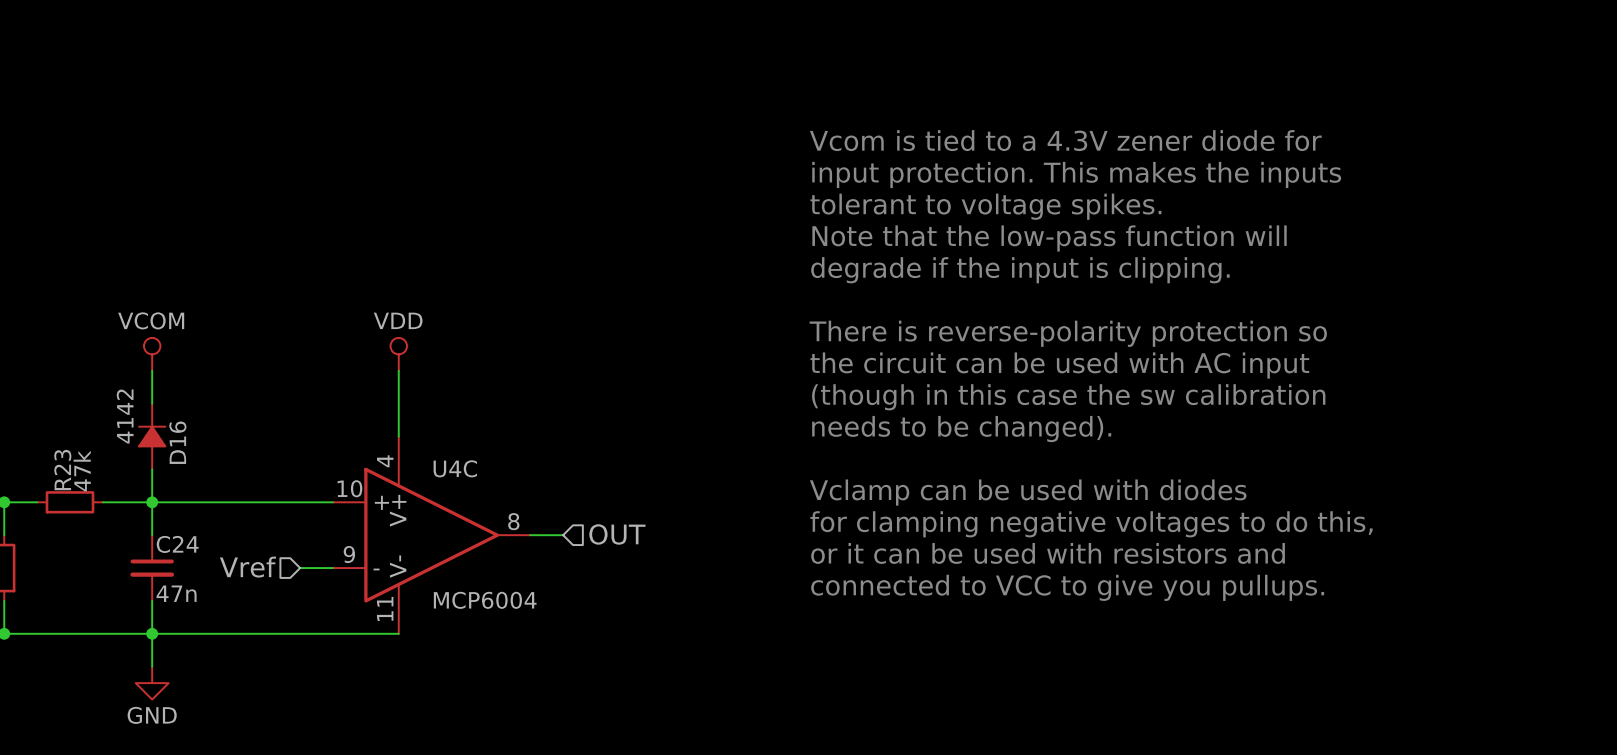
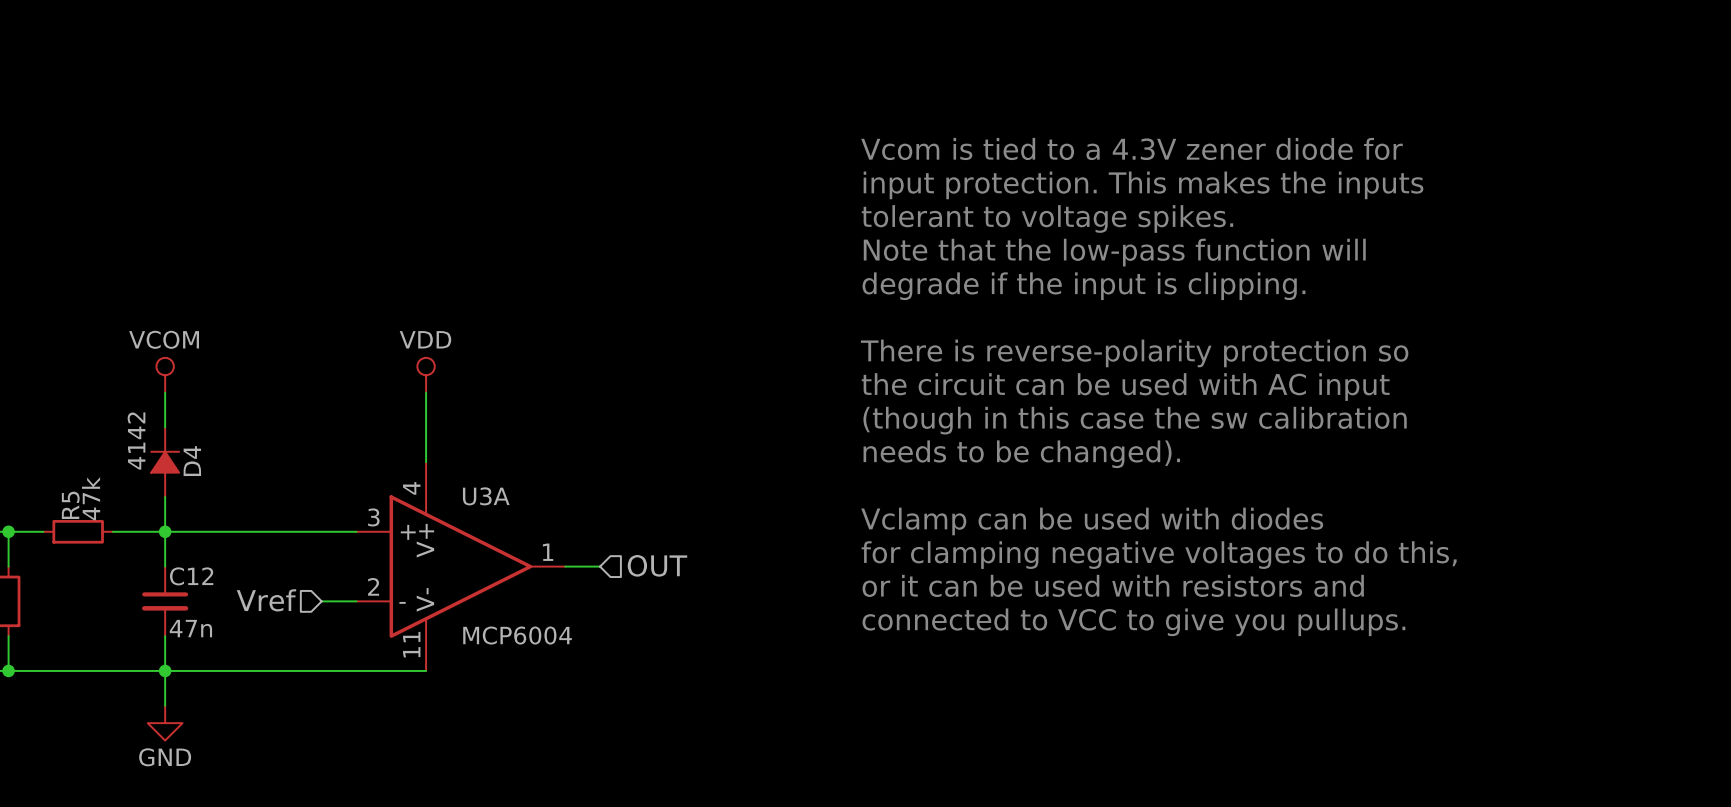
D16 name: D16 (177, 442) -> D4 (192, 461)
U4C name: U4C (455, 468) -> U3A (486, 496)
R23 name: R23 (62, 470) -> R5 (70, 505)
U4C pin number: 10 (349, 488) -> 3 (373, 517)
U4C pin number: 8 (513, 521) -> 1 (548, 552)
C24 name: C24 (177, 544) -> C12 (191, 576)
U4C pin number: 9 (349, 554) -> 2 (373, 586)

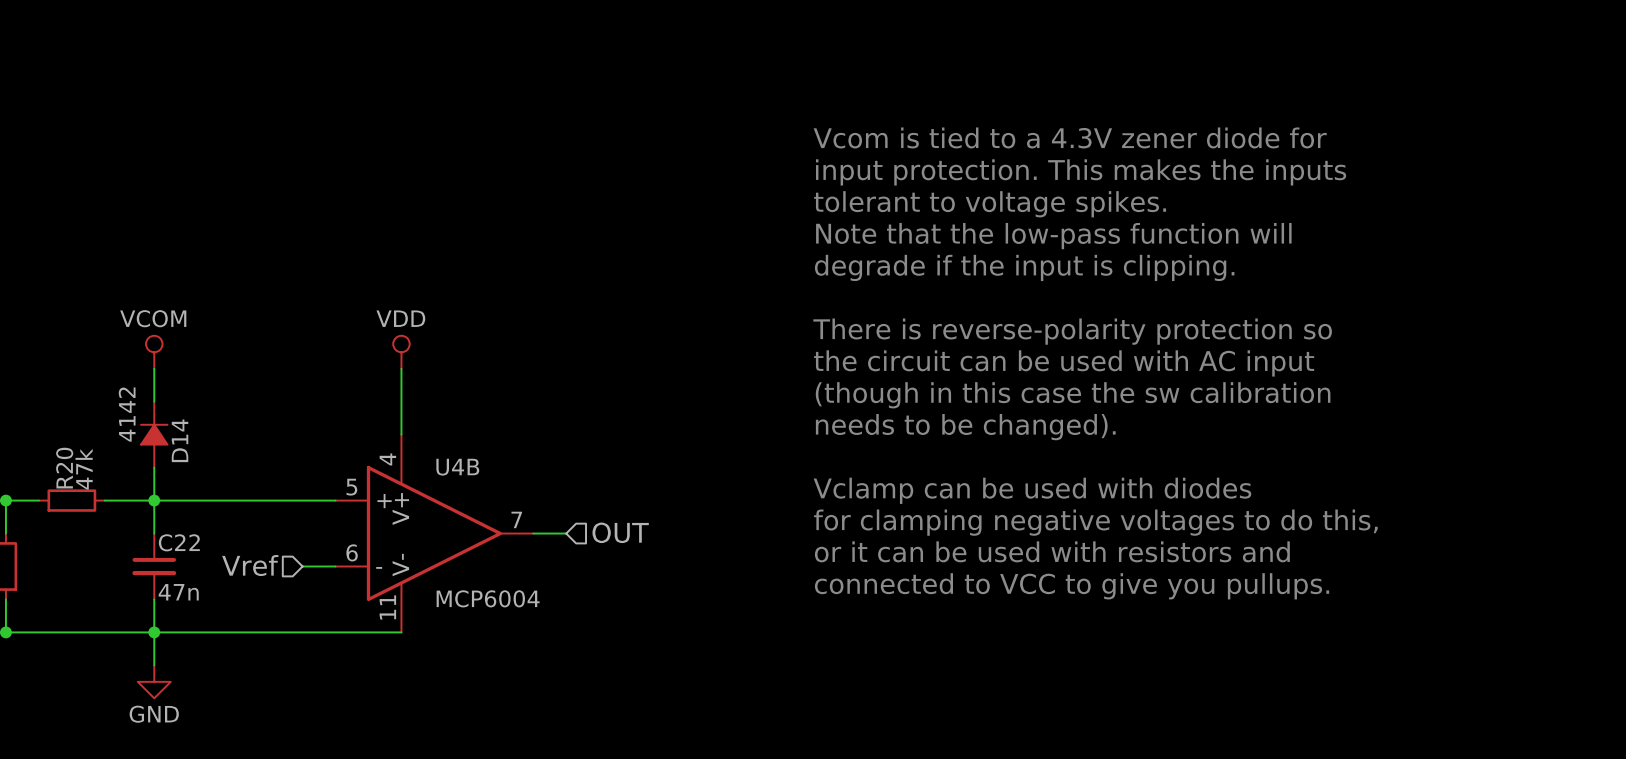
D4 name: D4 (192, 461) -> D14 (180, 440)
U3A name: U3A (486, 496) -> U4B (457, 467)
R5 name: R5 (70, 505) -> R20 (64, 468)
U3A pin number: 3 (373, 517) -> 5 (351, 487)
U3A pin number: 1 (548, 552) -> 7 (516, 519)
C12 name: C12 (191, 576) -> C22 (179, 542)
U3A pin number: 2 (373, 586) -> 6 (352, 552)

